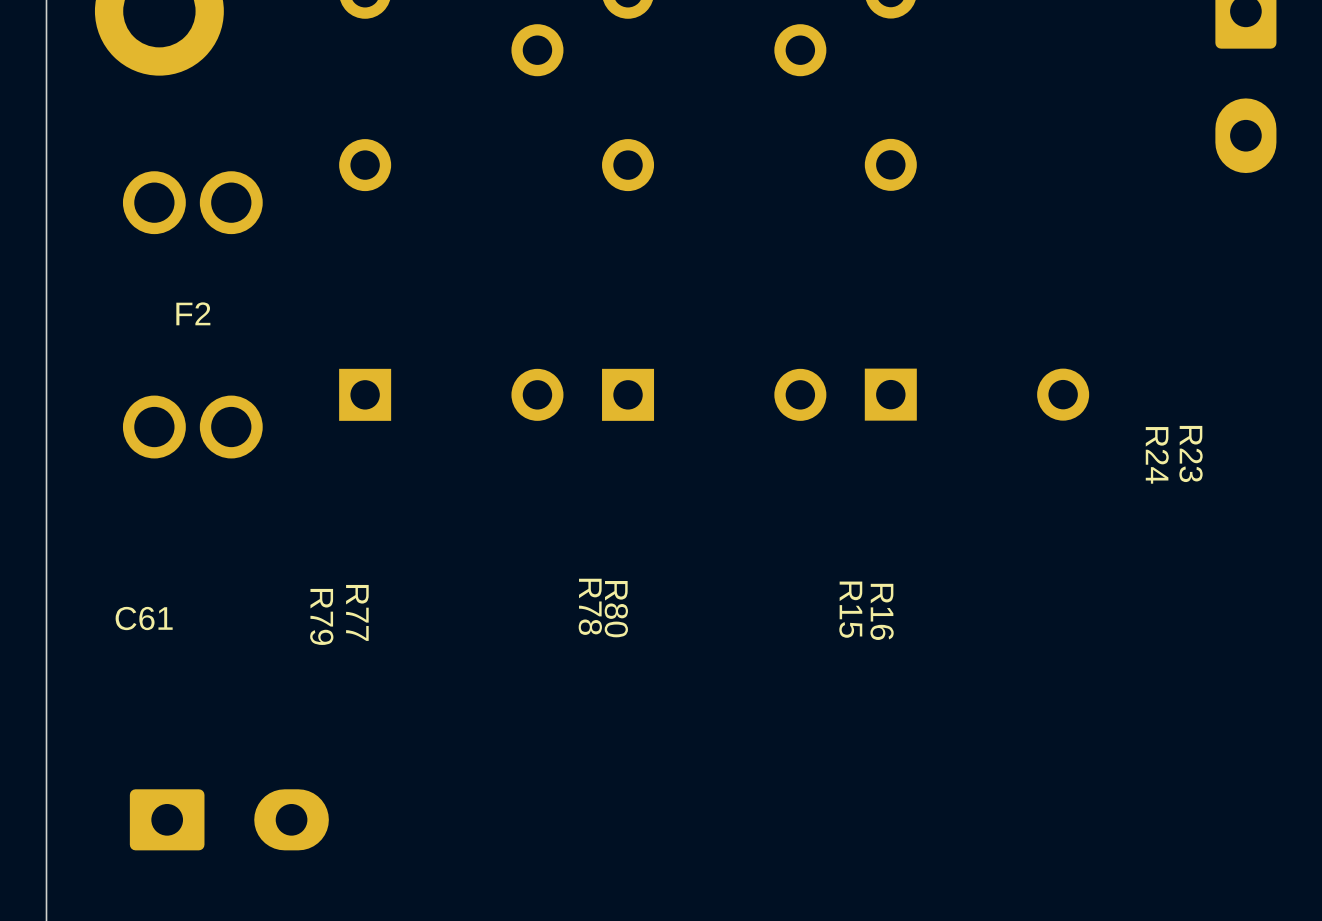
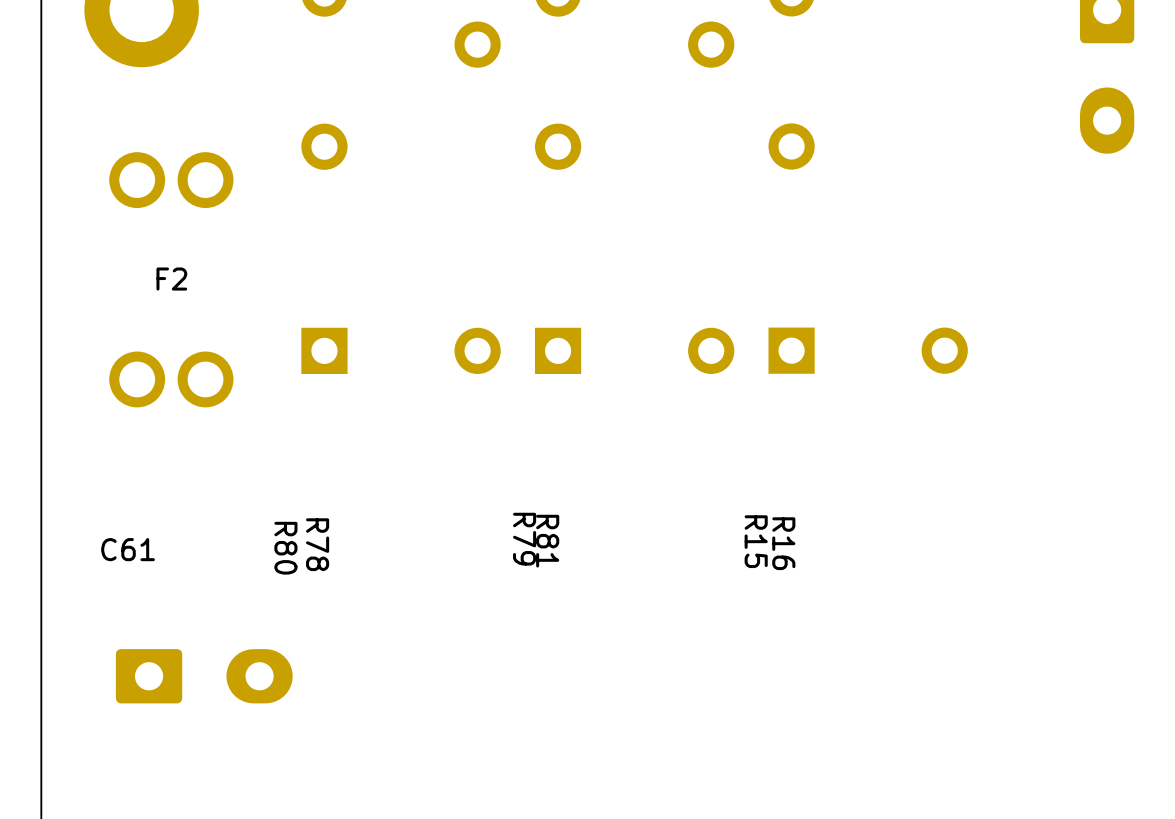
R23: (1191, 453) -> none
R24: (1157, 455) -> none
R78 name: R78 (590, 606) -> R79 (524, 539)
R80 name: R80 (616, 609) -> R81 (547, 541)
R77 name: R77 (357, 612) -> R78 (317, 544)
R79 name: R79 (321, 616) -> R80 (285, 548)
part position: (229, 819) -> (204, 676)

